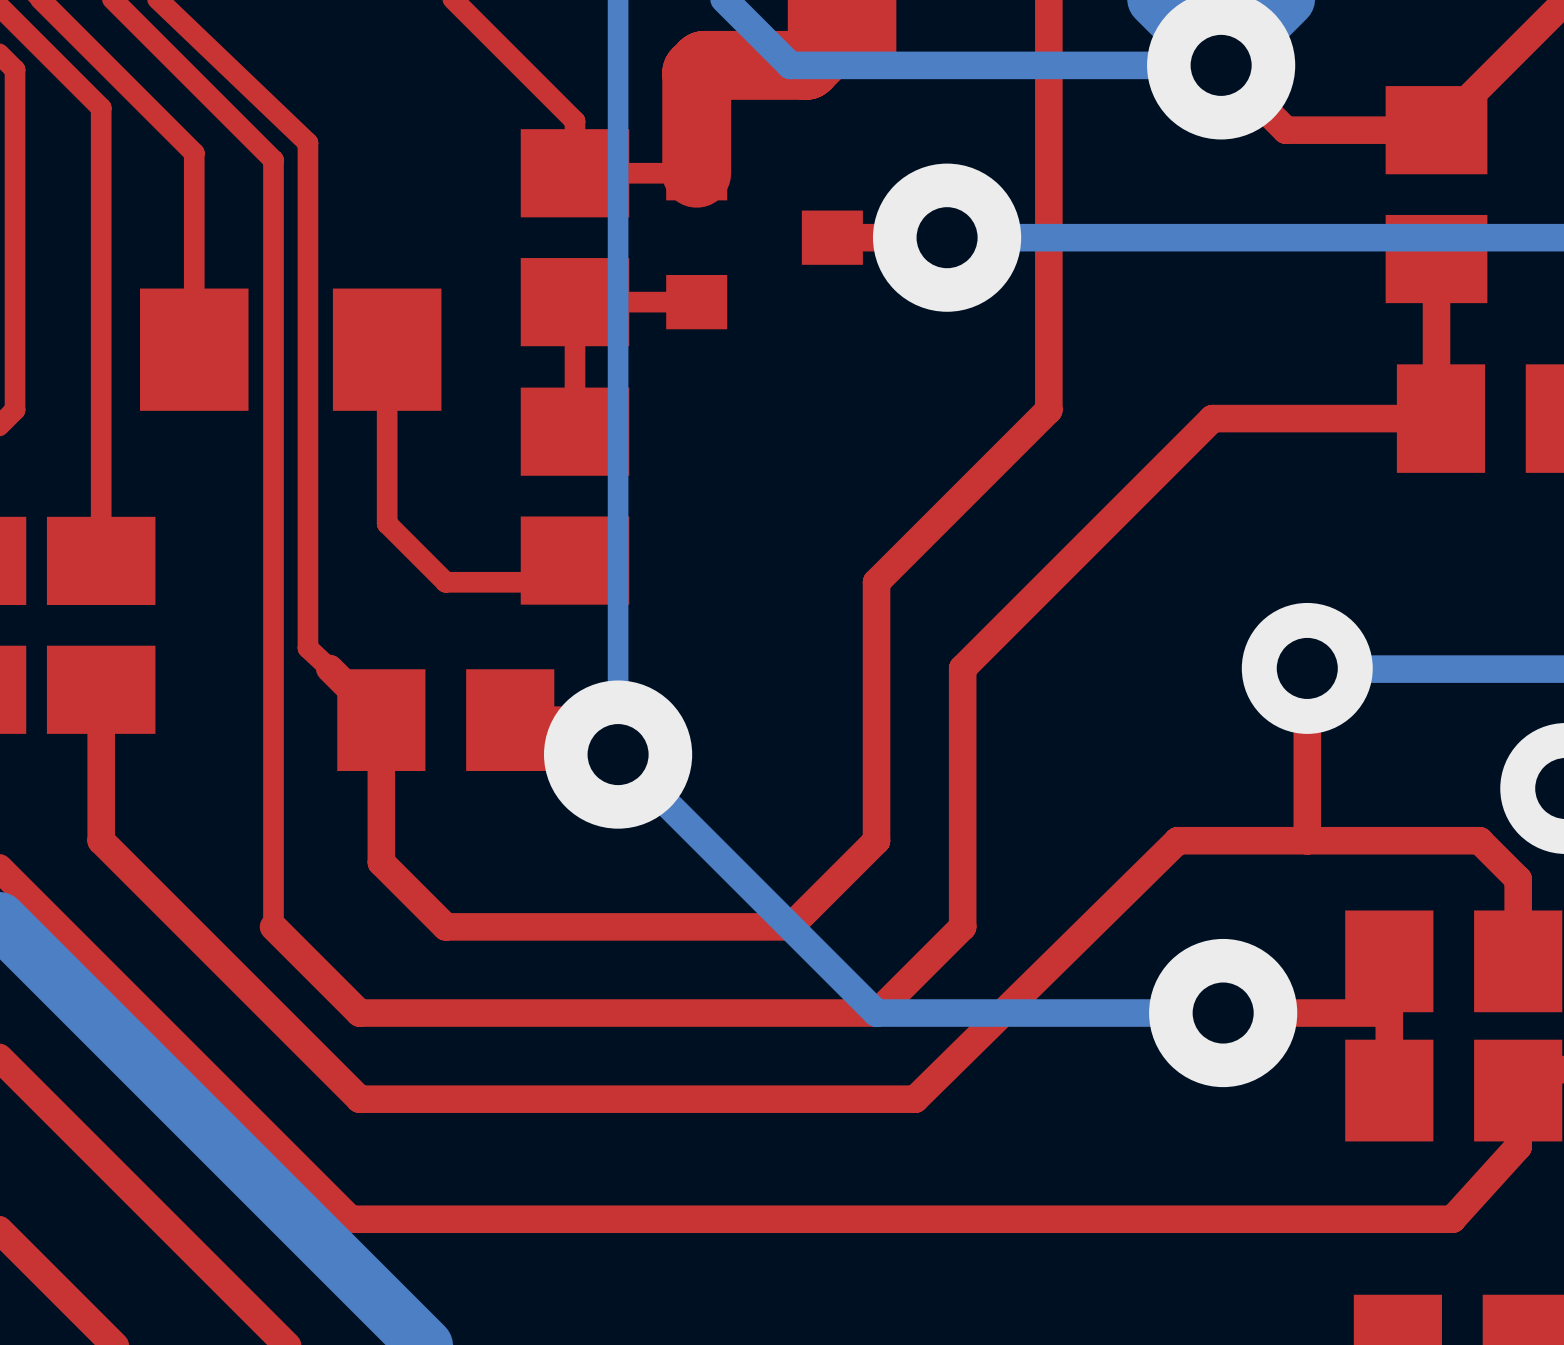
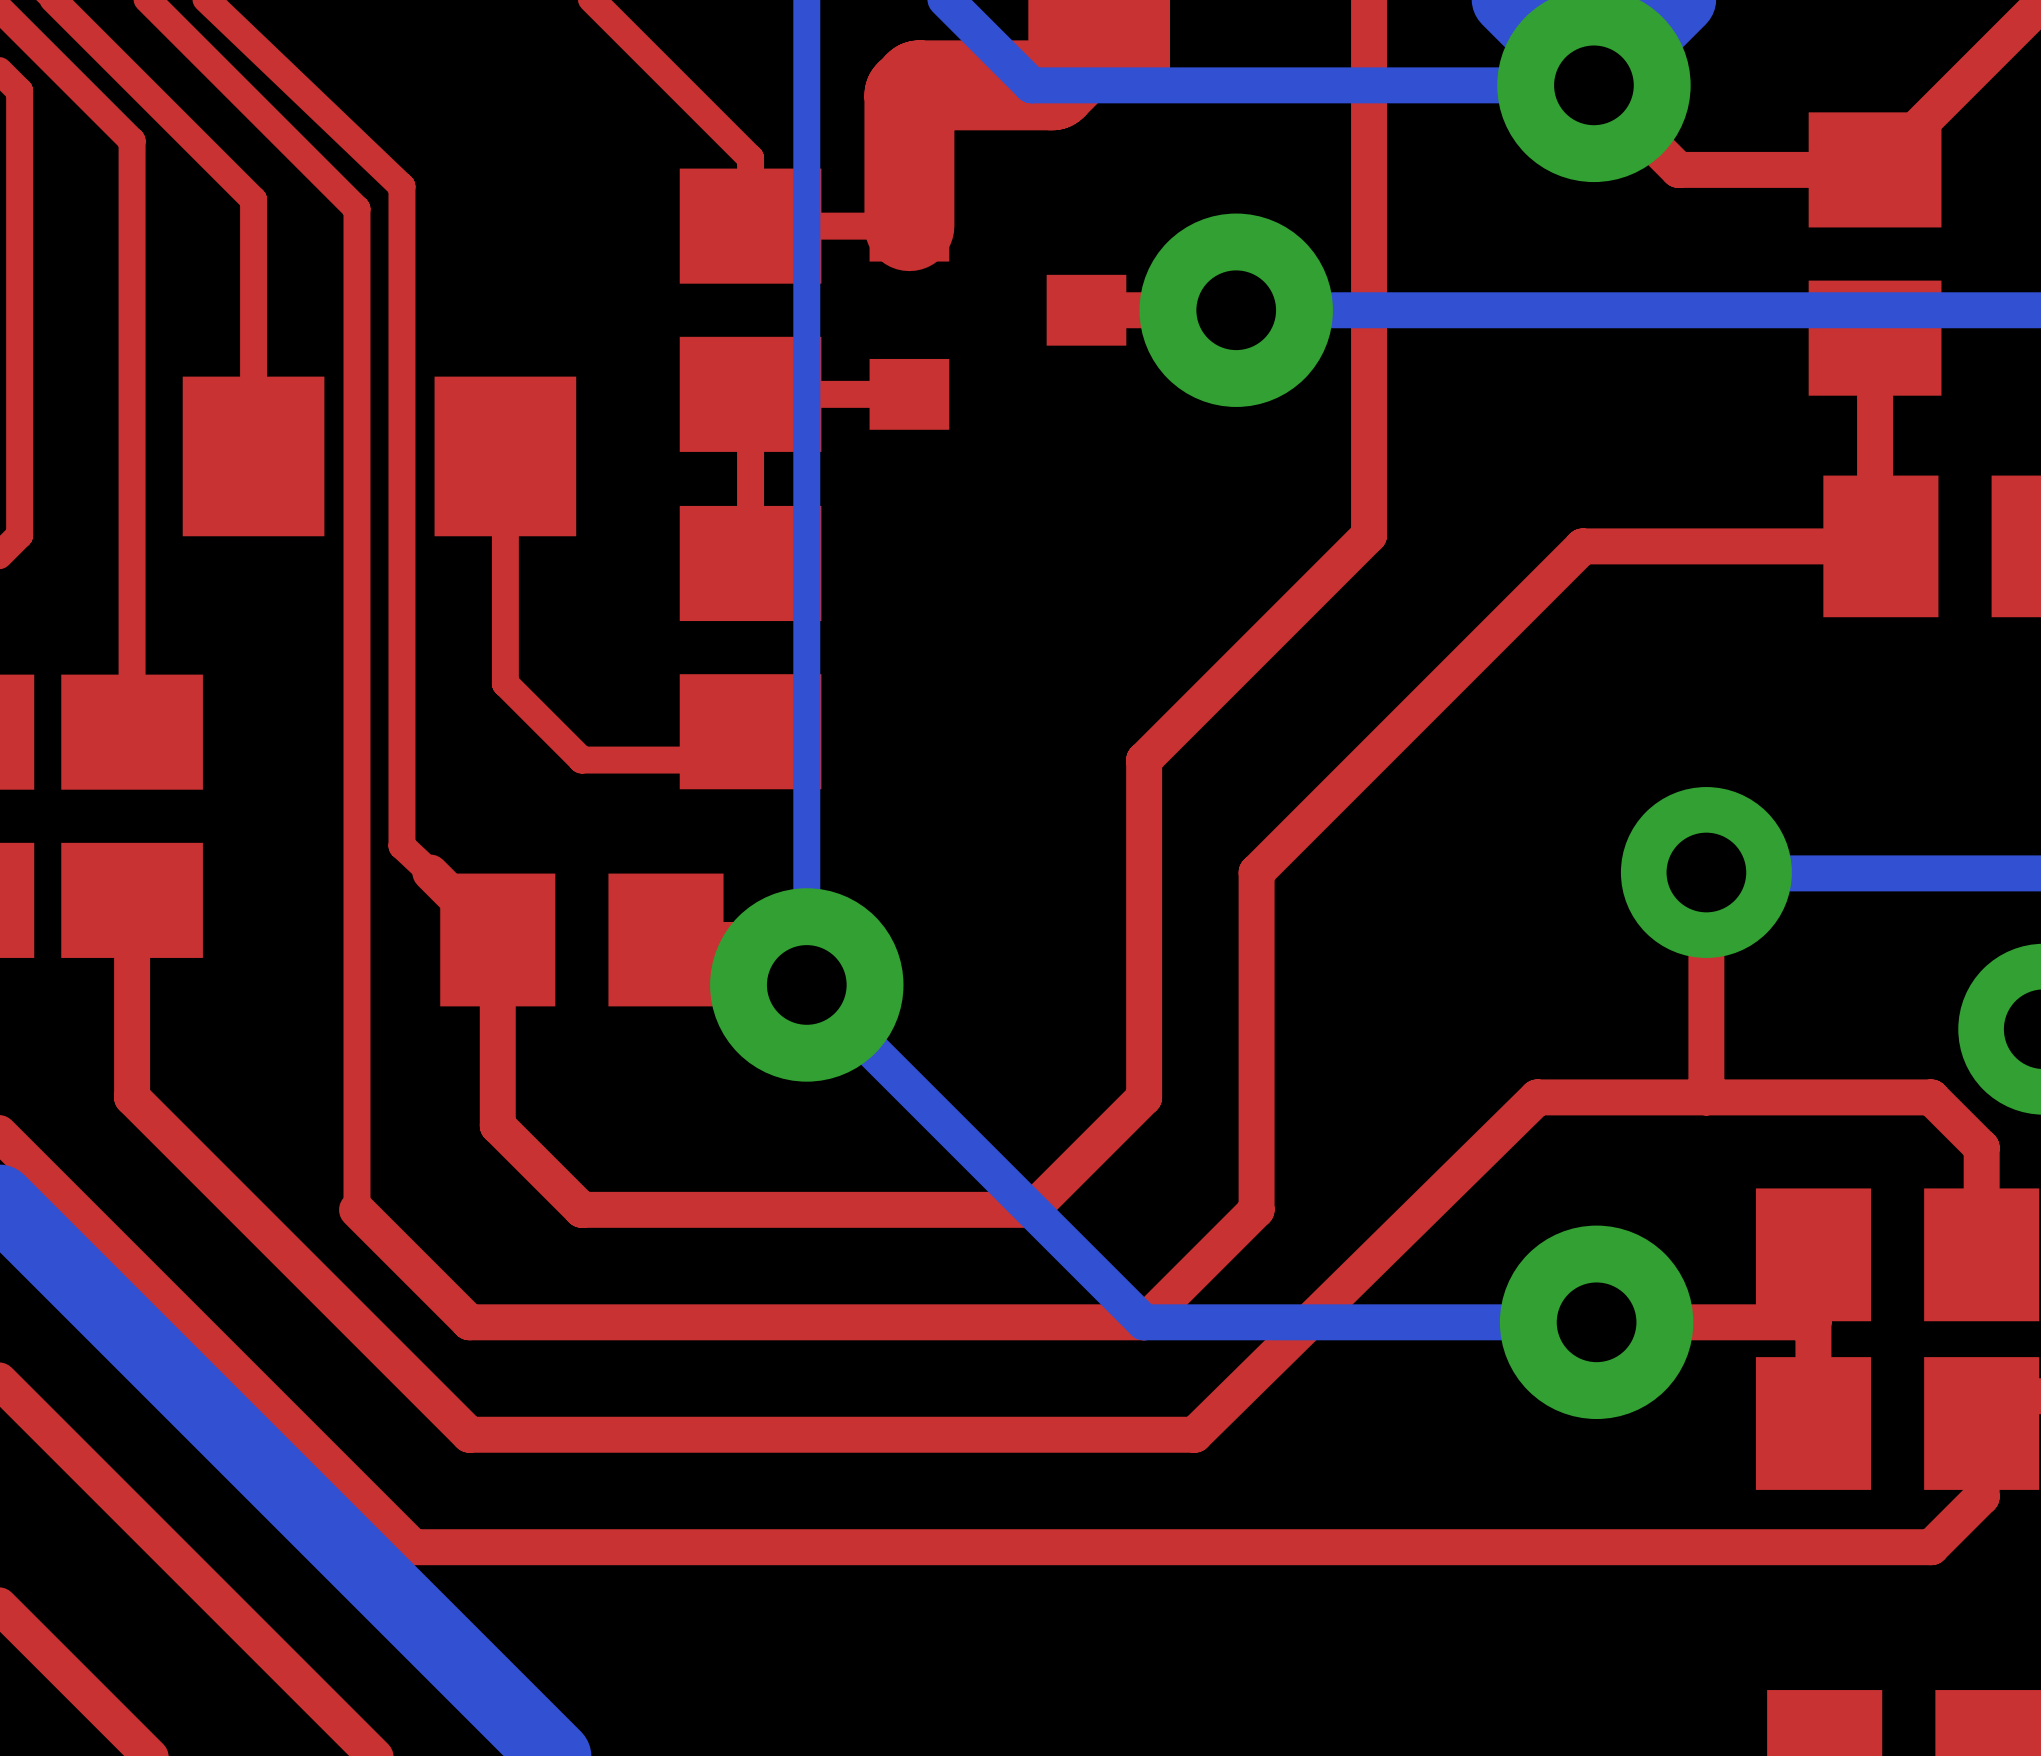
top track: (1518, 1146) (1452, 1219) (350, 1219) (316, 1185) -> (1981, 1496) (1931, 1547) (413, 1547)

